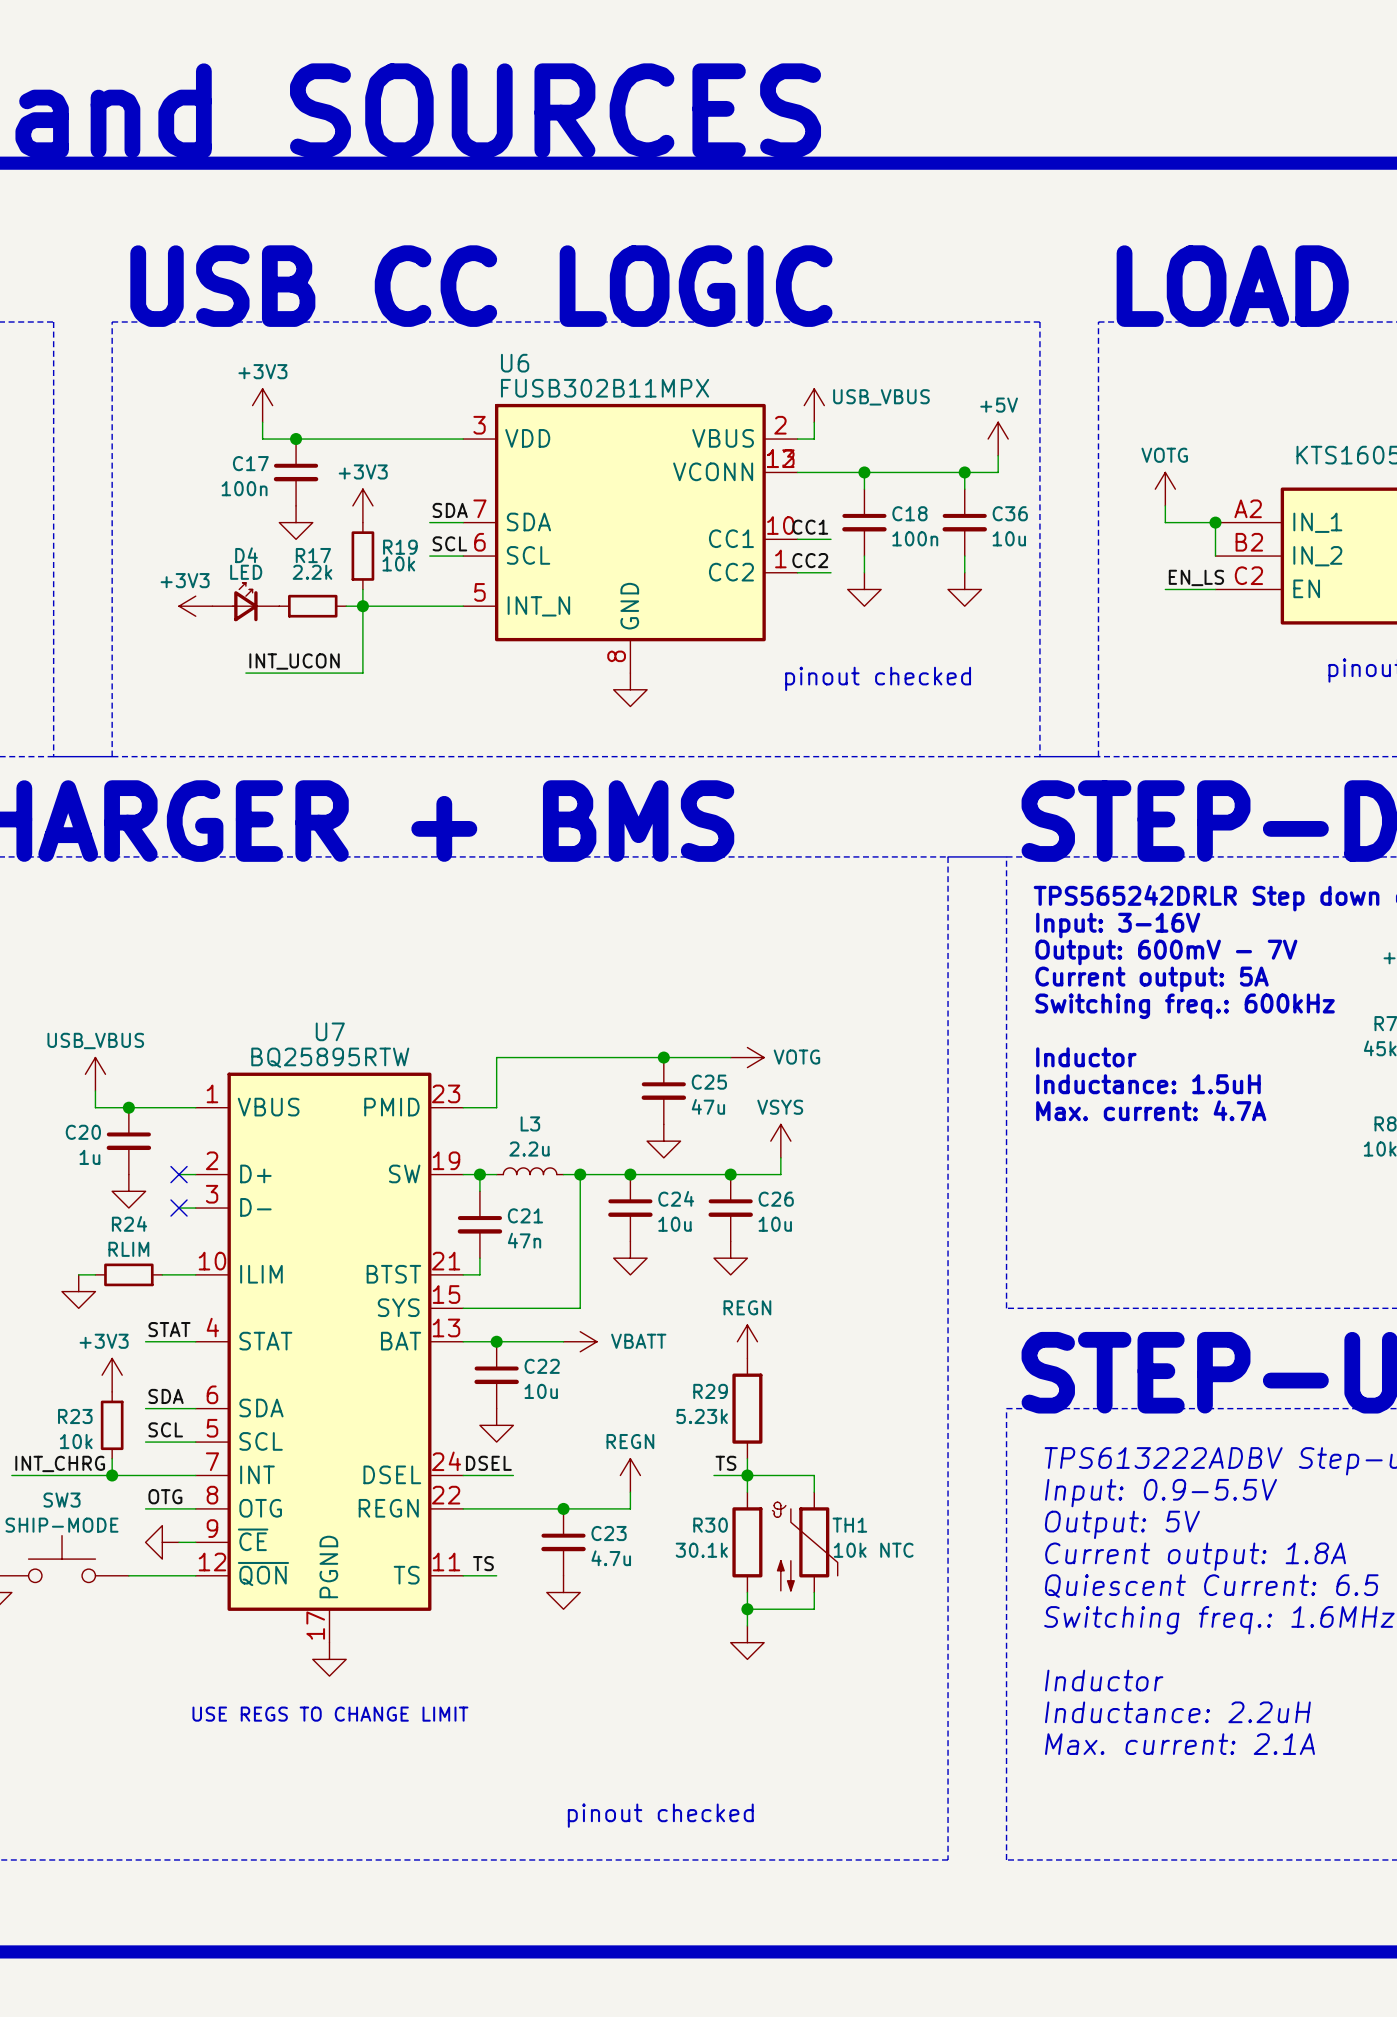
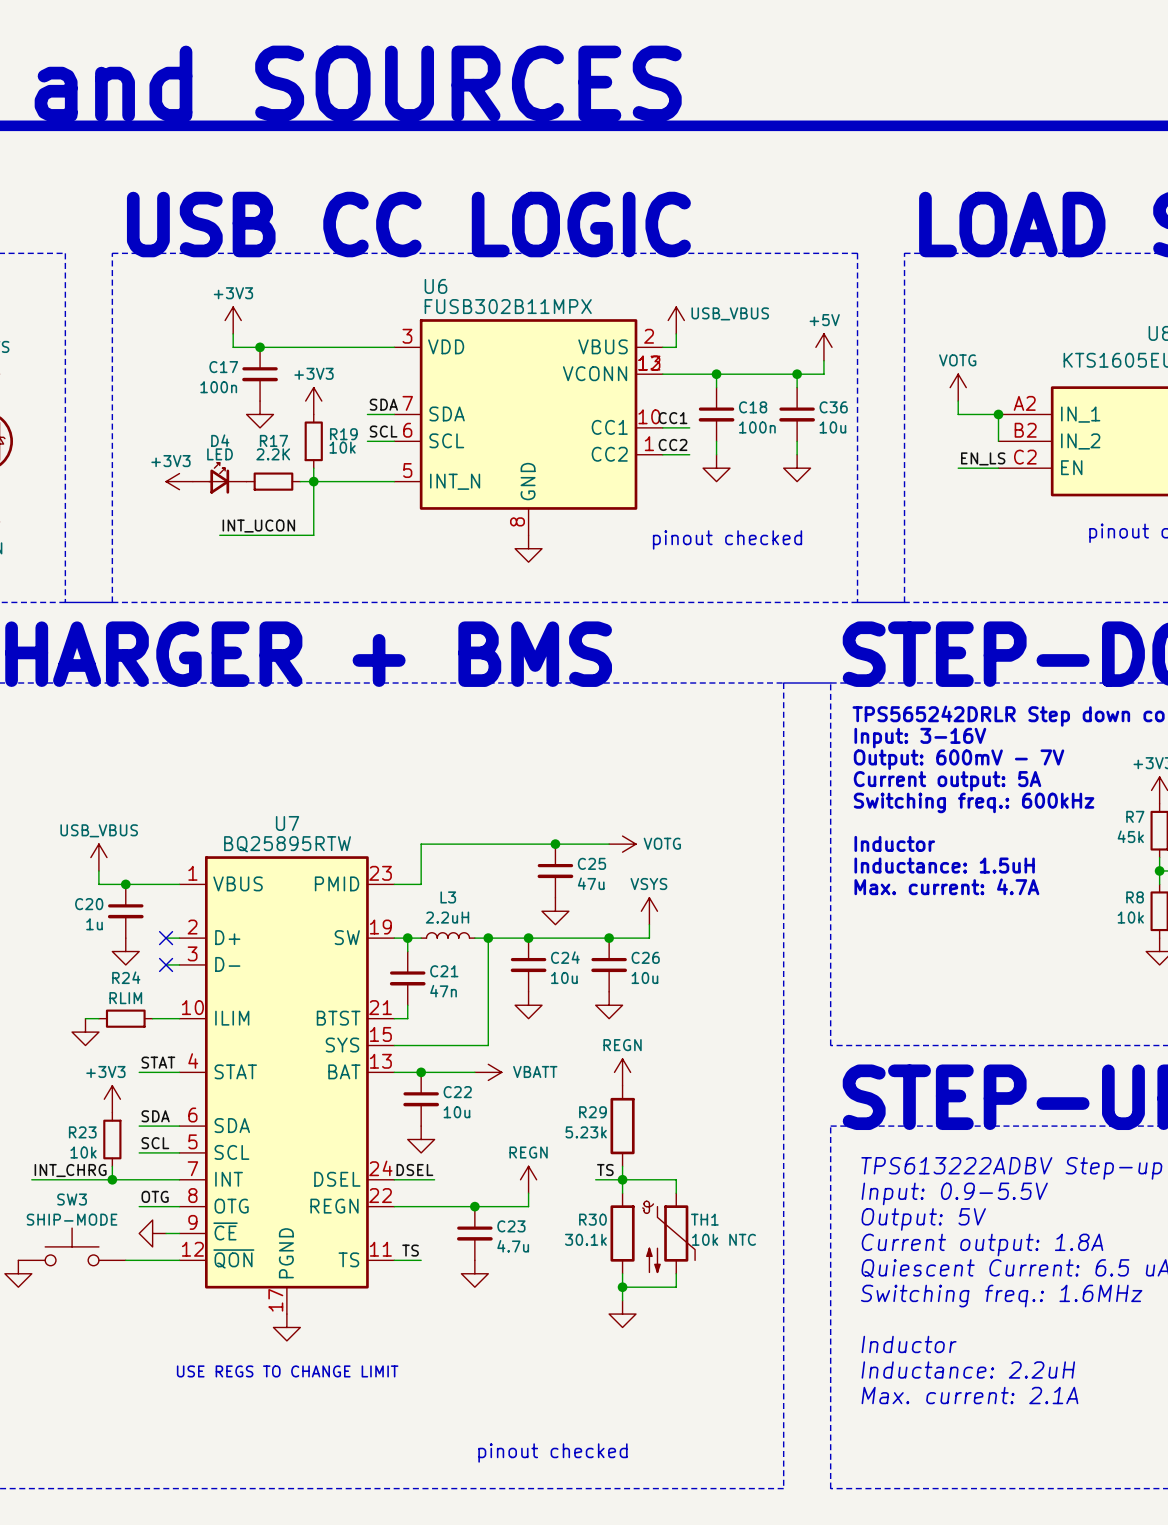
R17 value: 2.2k (312, 572) -> 2.2K (273, 454)
L3 value: 2.2u (529, 1149) -> 2.2uH (447, 917)

